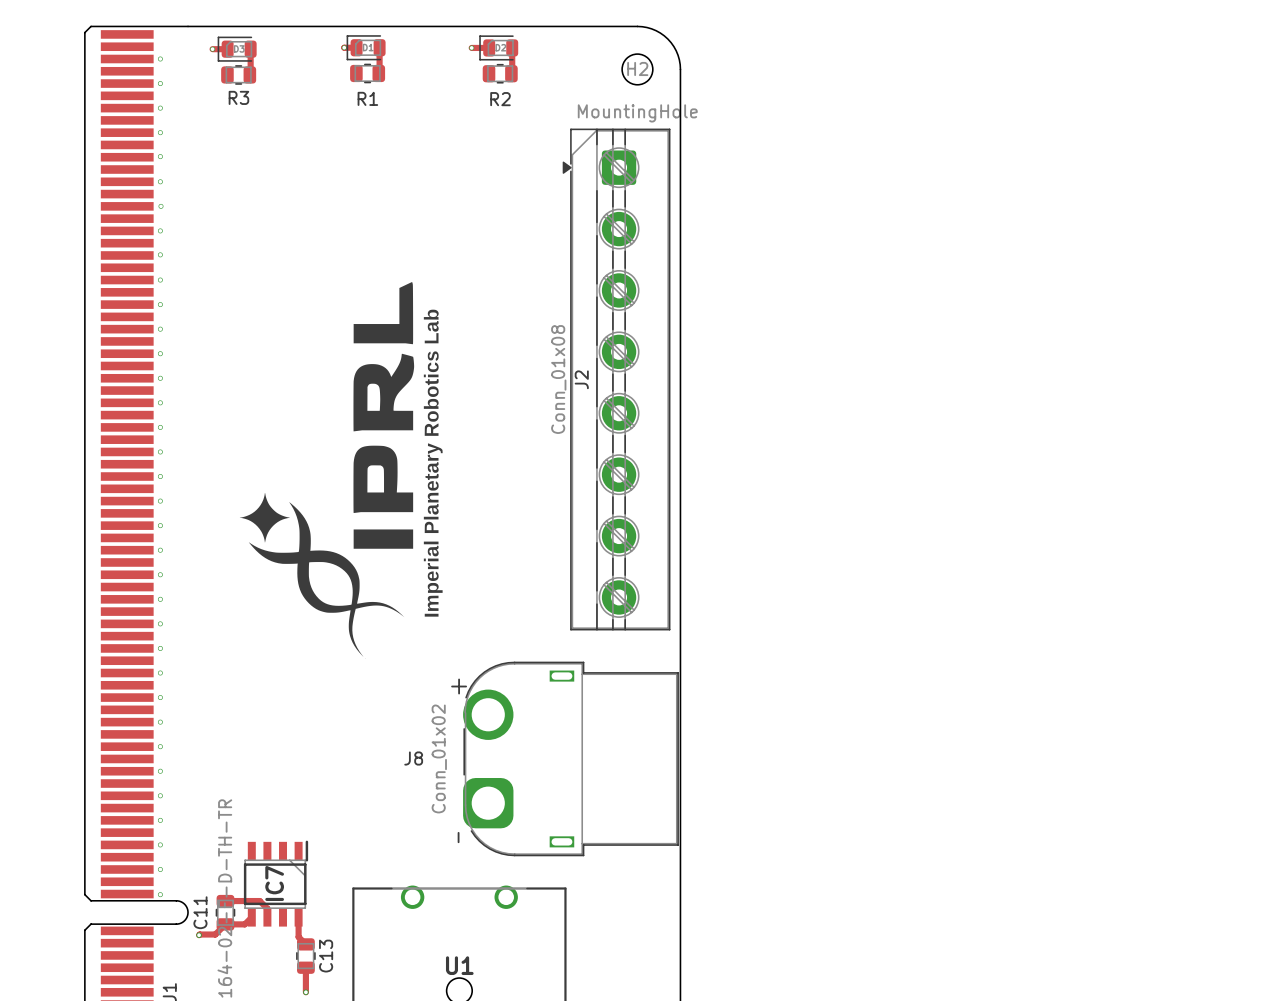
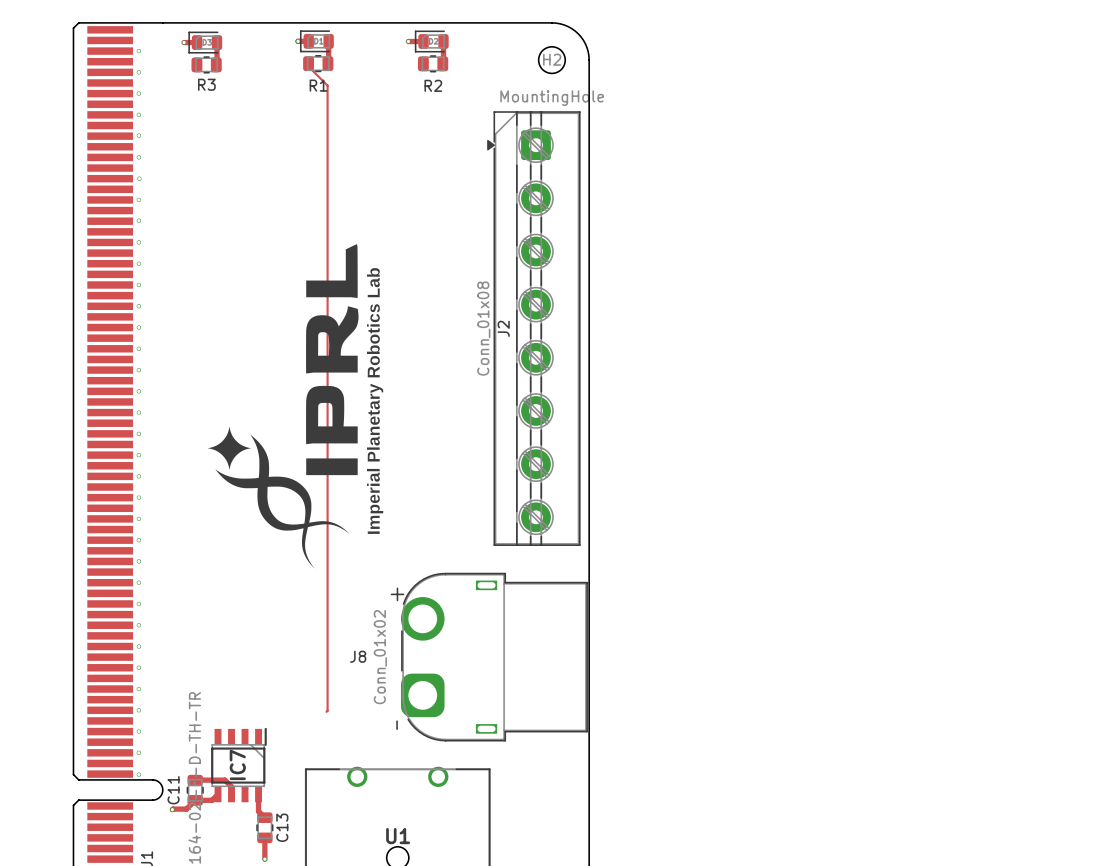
track: none -> (308, 63) (308, 66) (327, 85) (326, 711)

